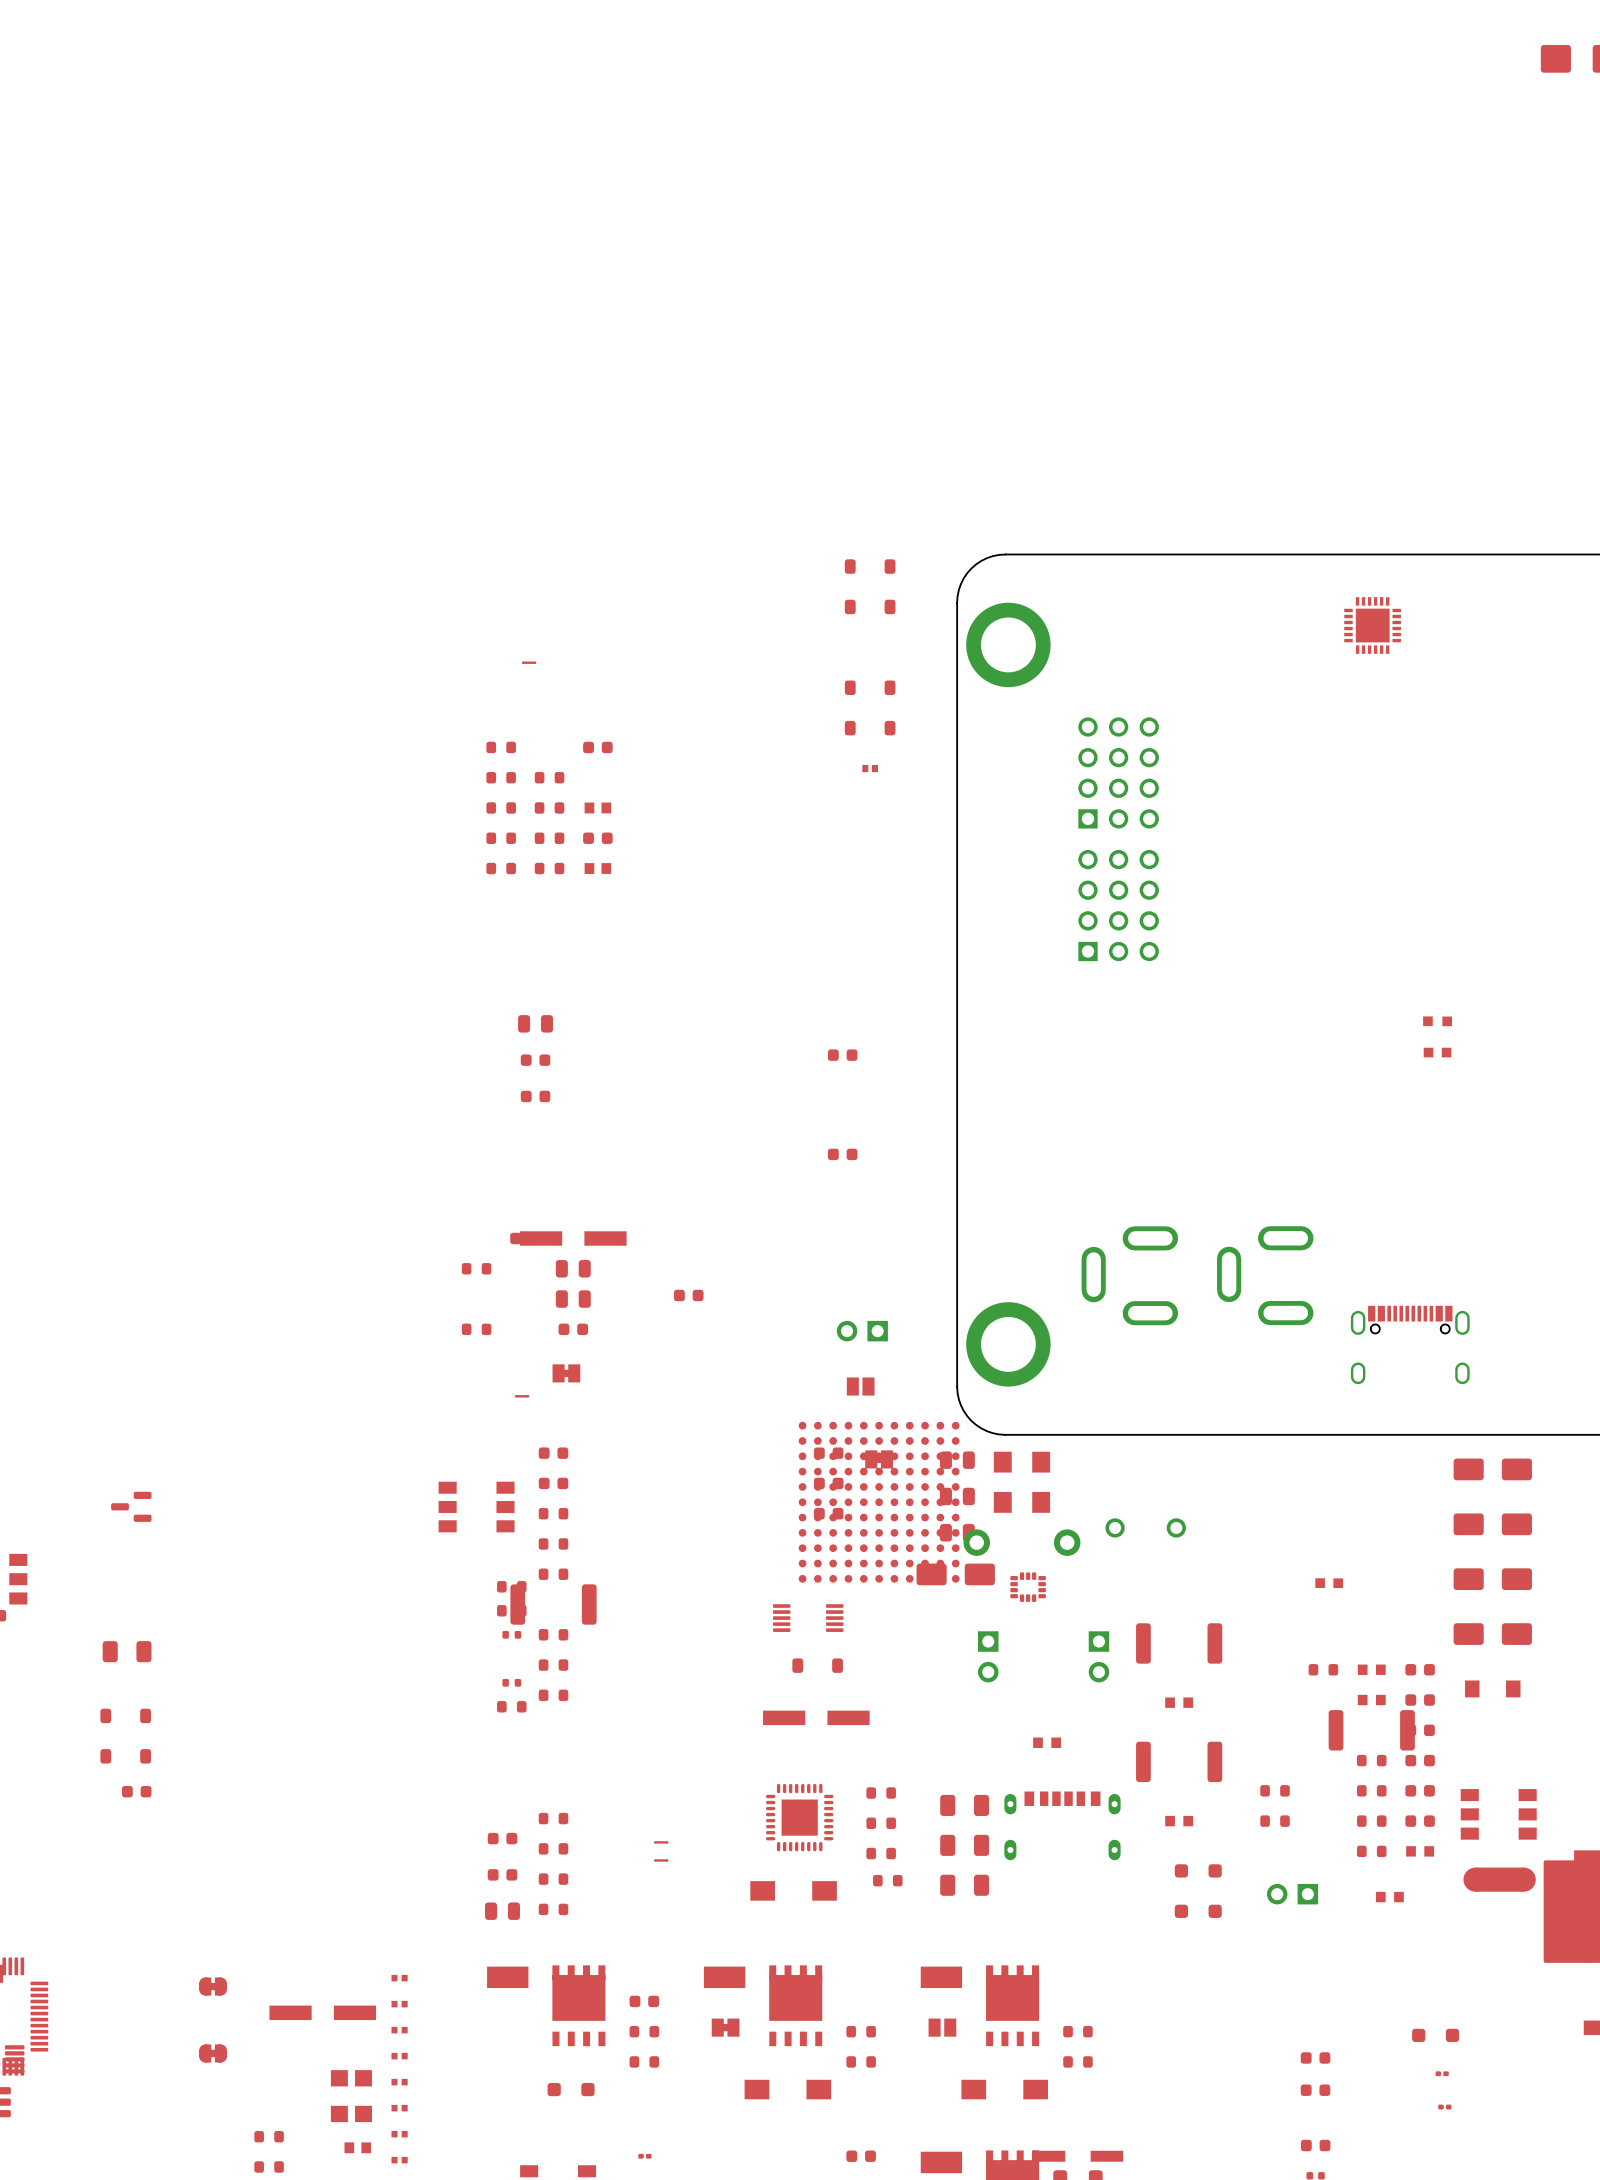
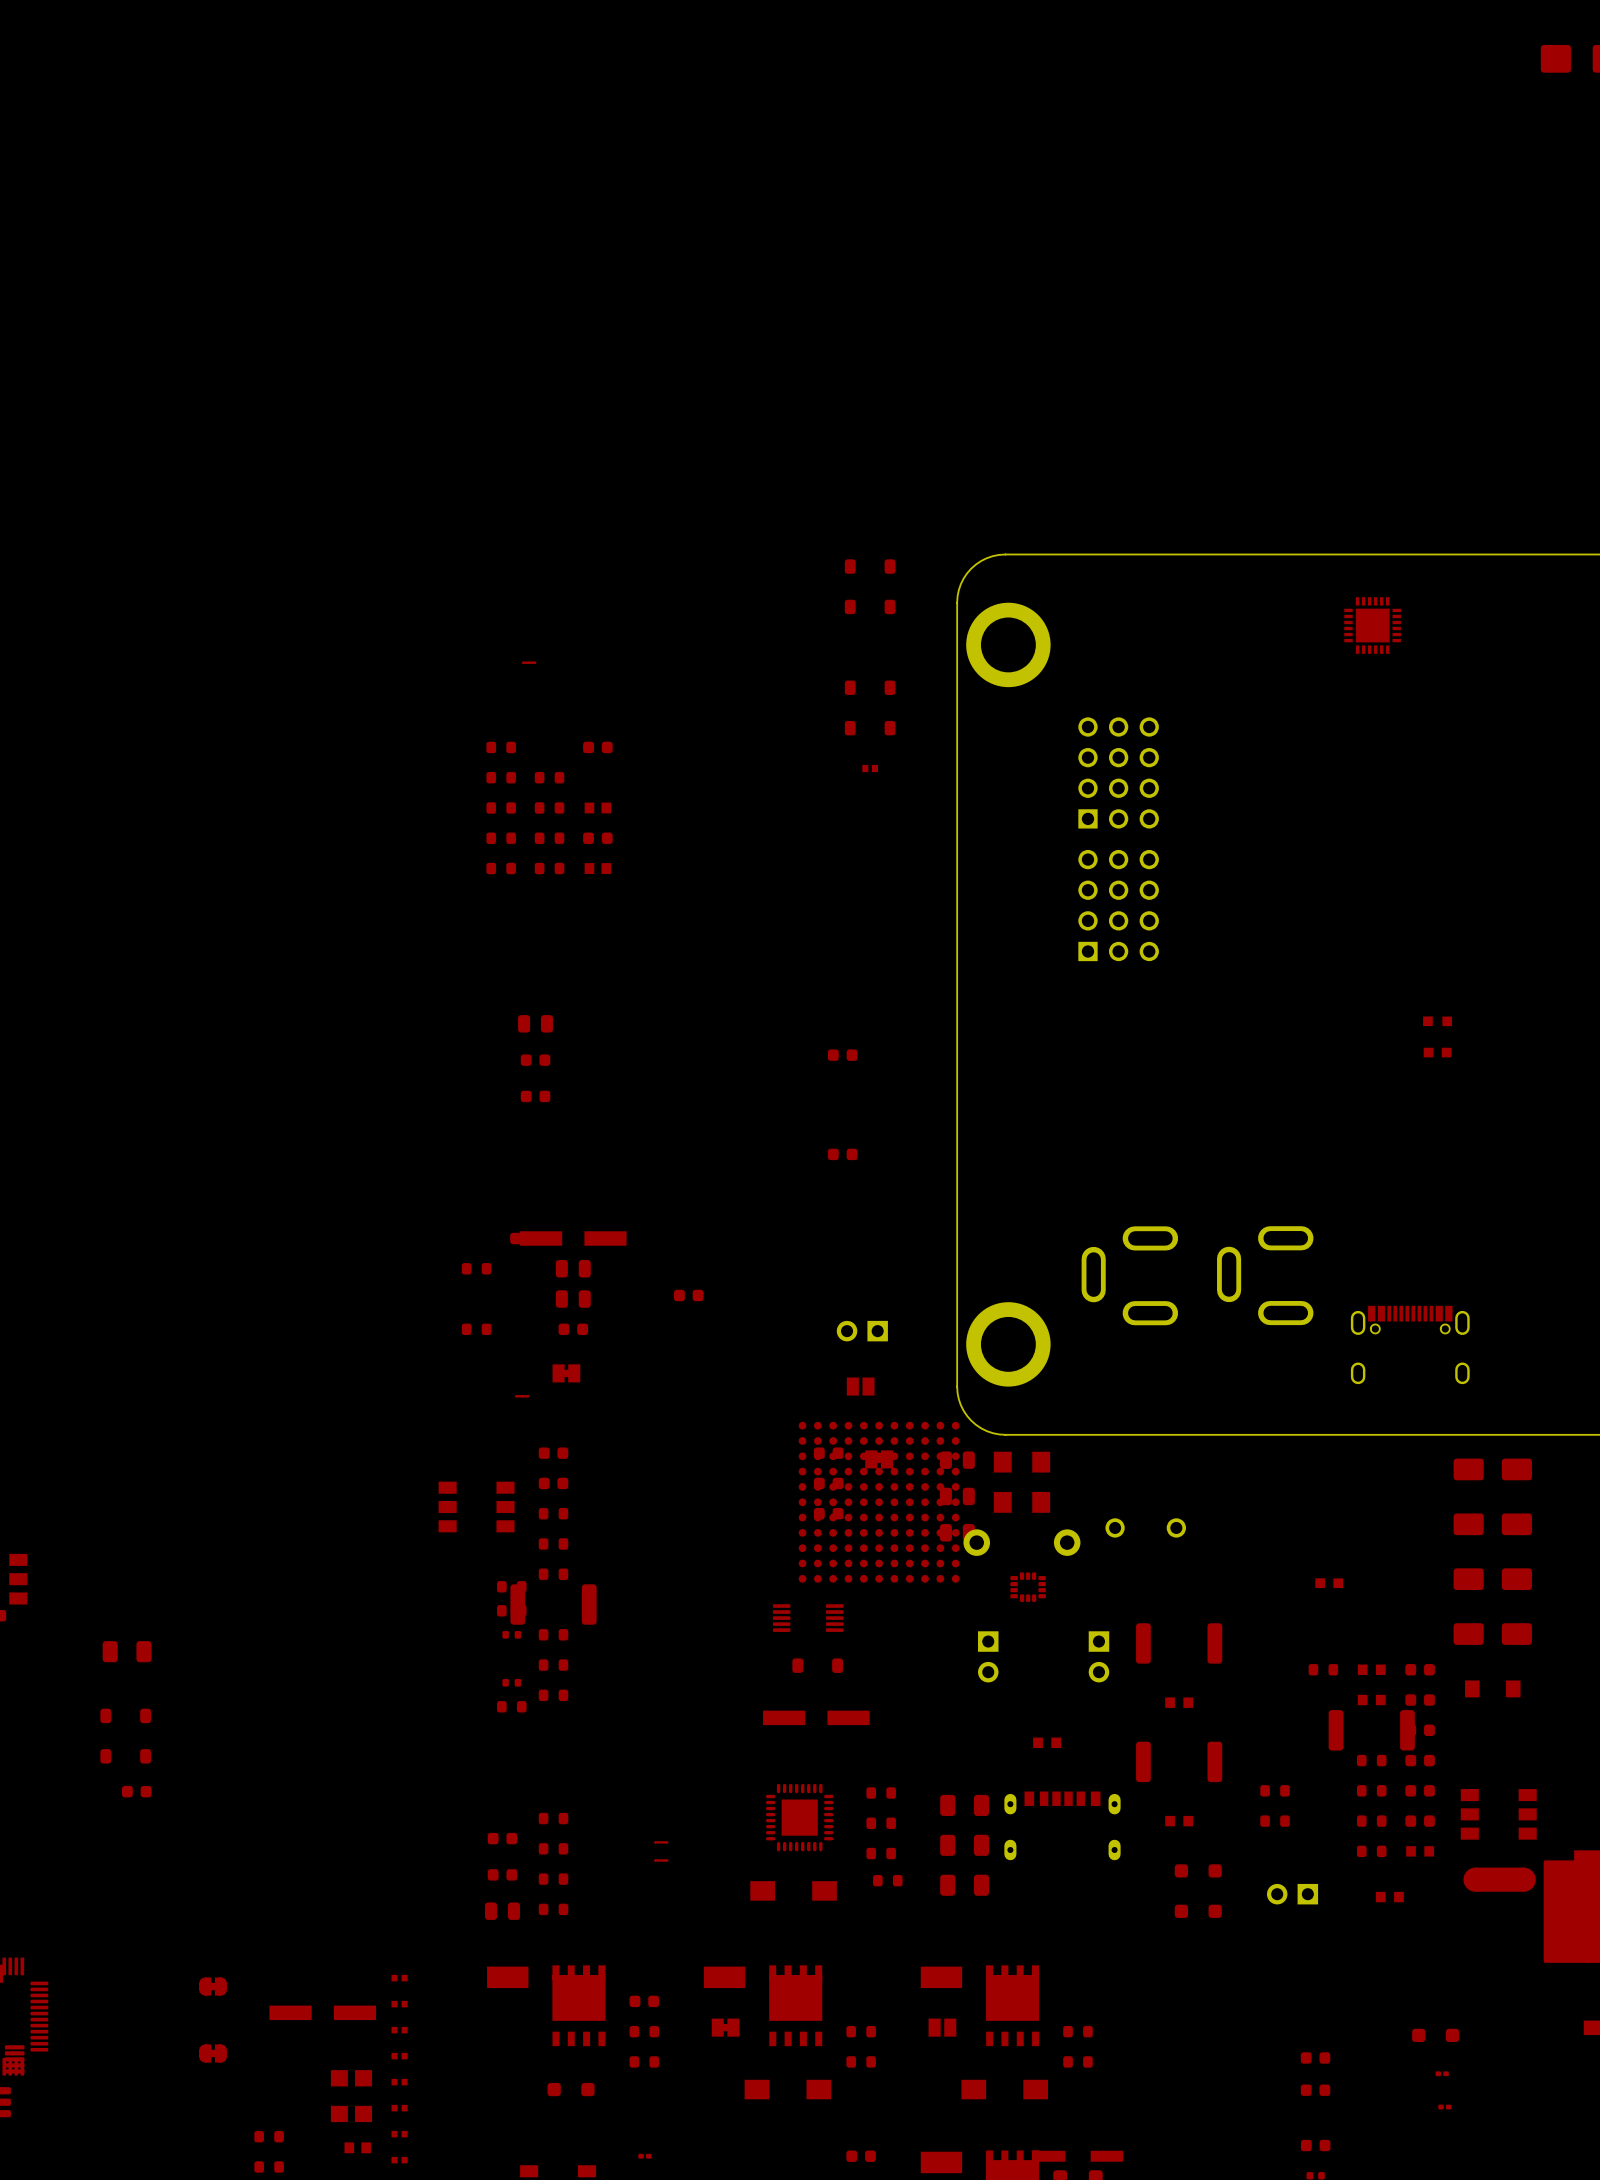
part: (131, 1506) -> none
part: (955, 1574) -> none

